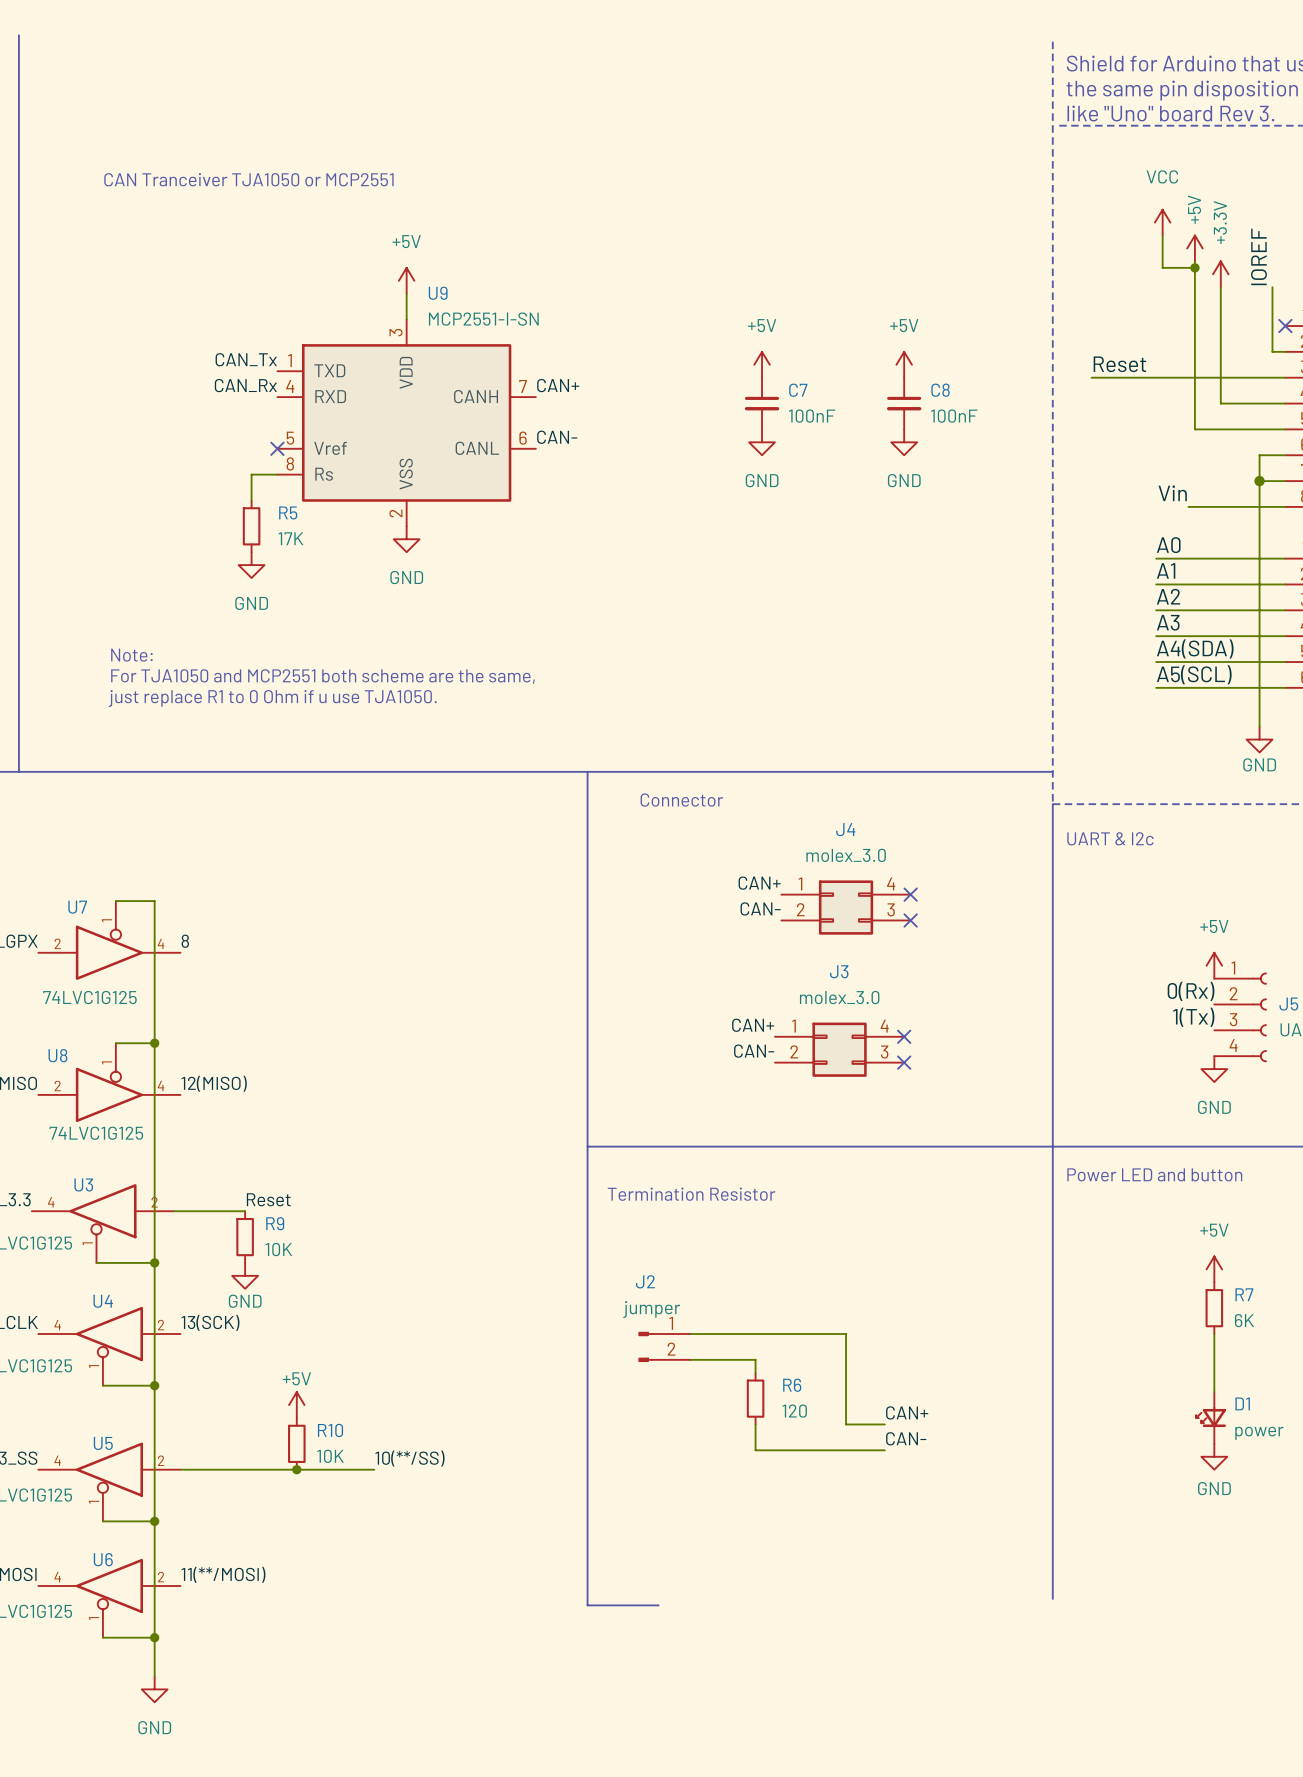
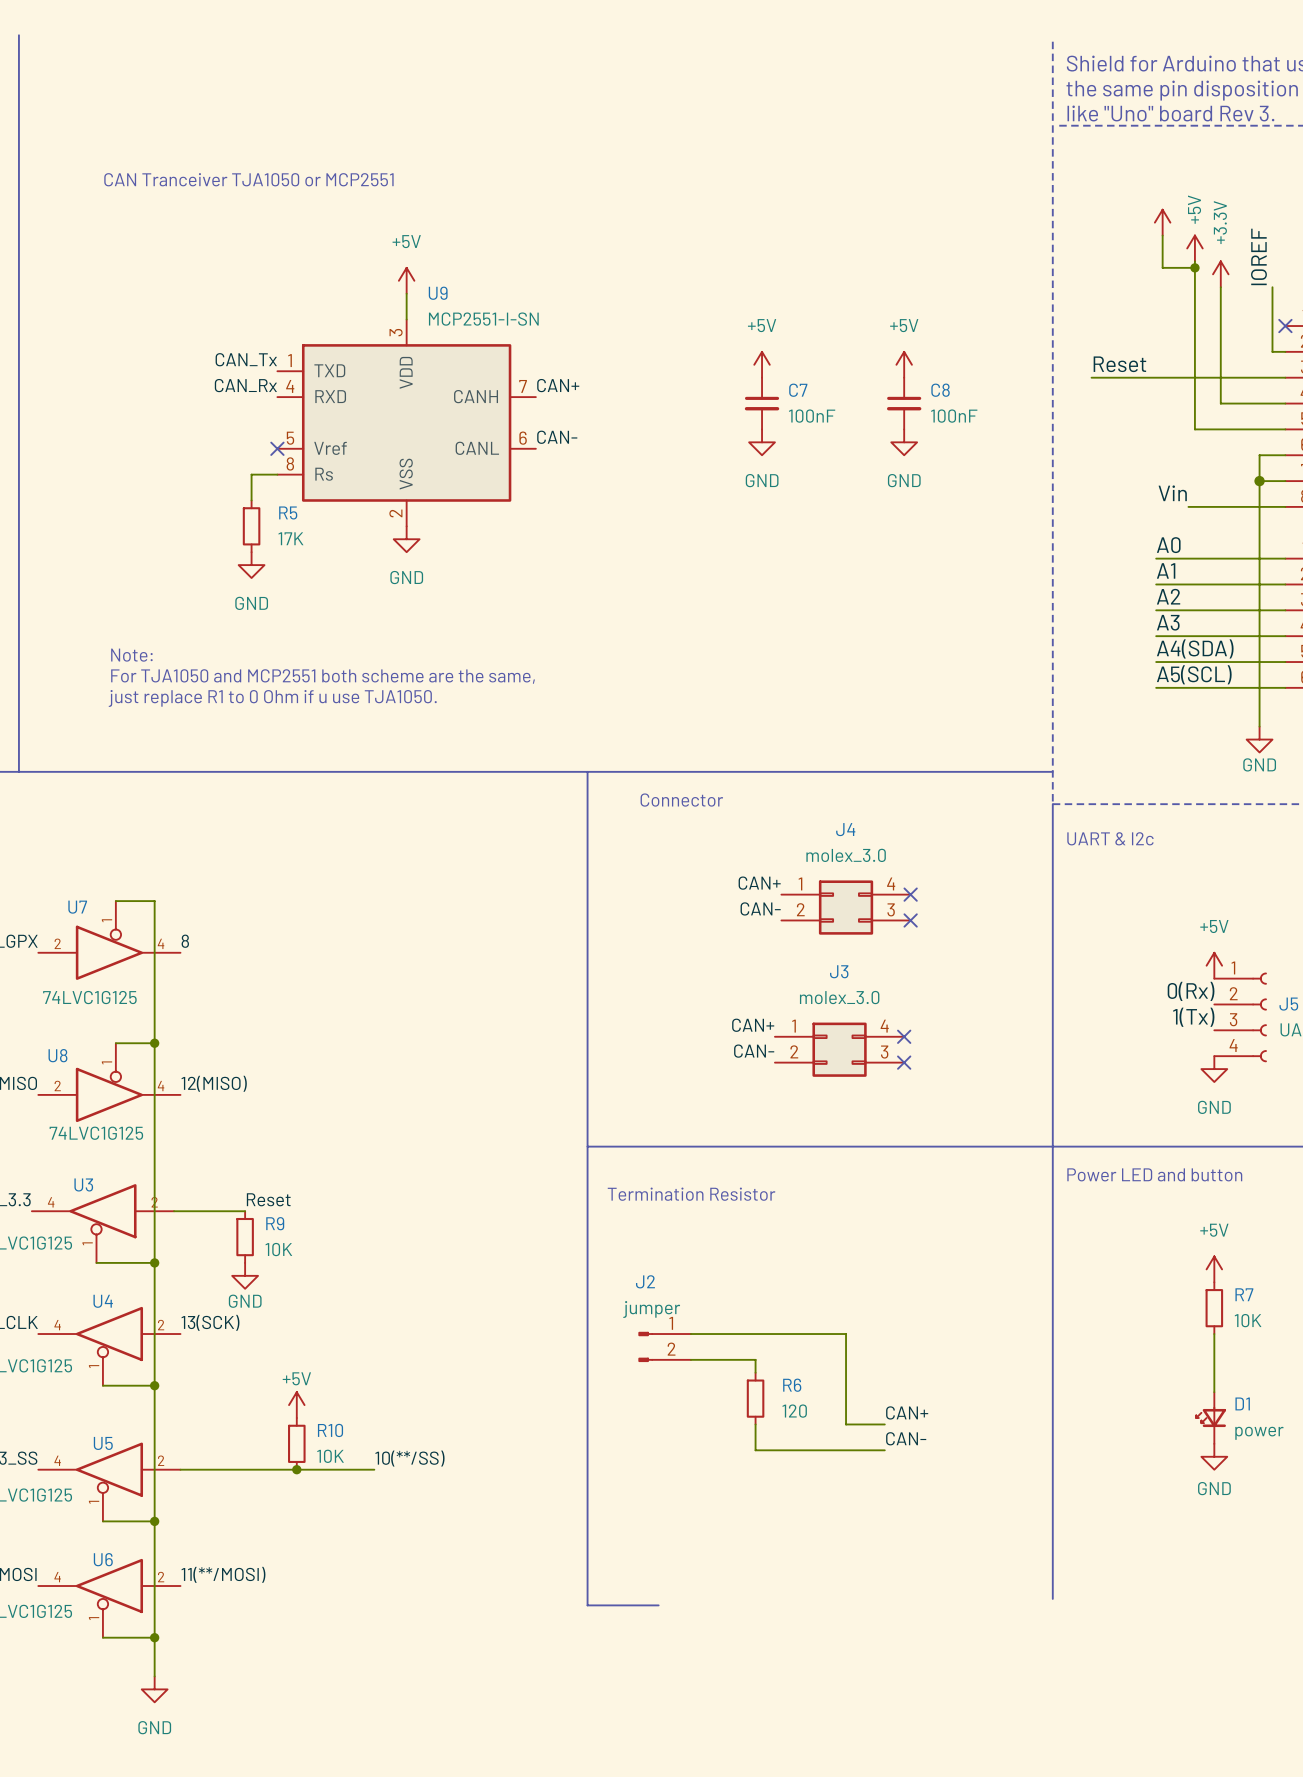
power symbol text: VCC (1162, 176) -> none
R7 value: 6K (1244, 1320) -> 10K (1248, 1320)

